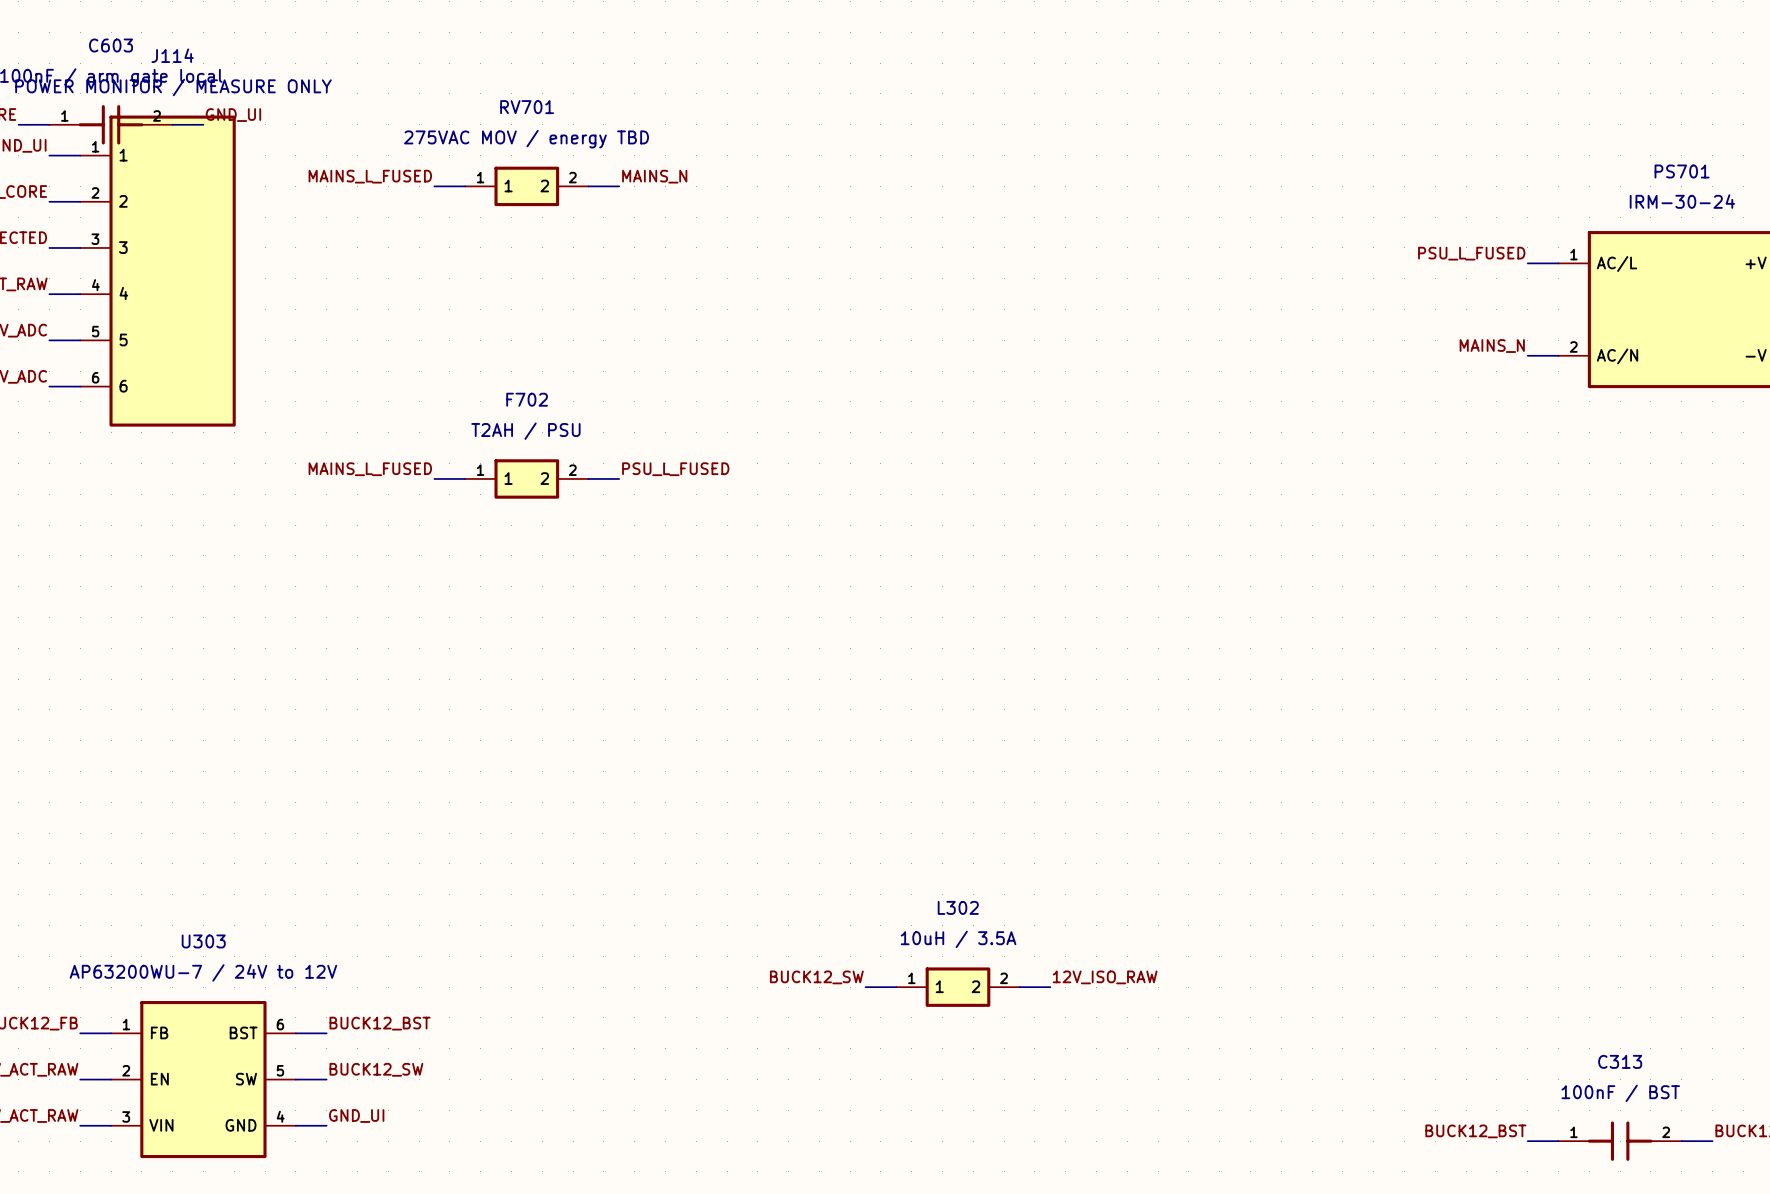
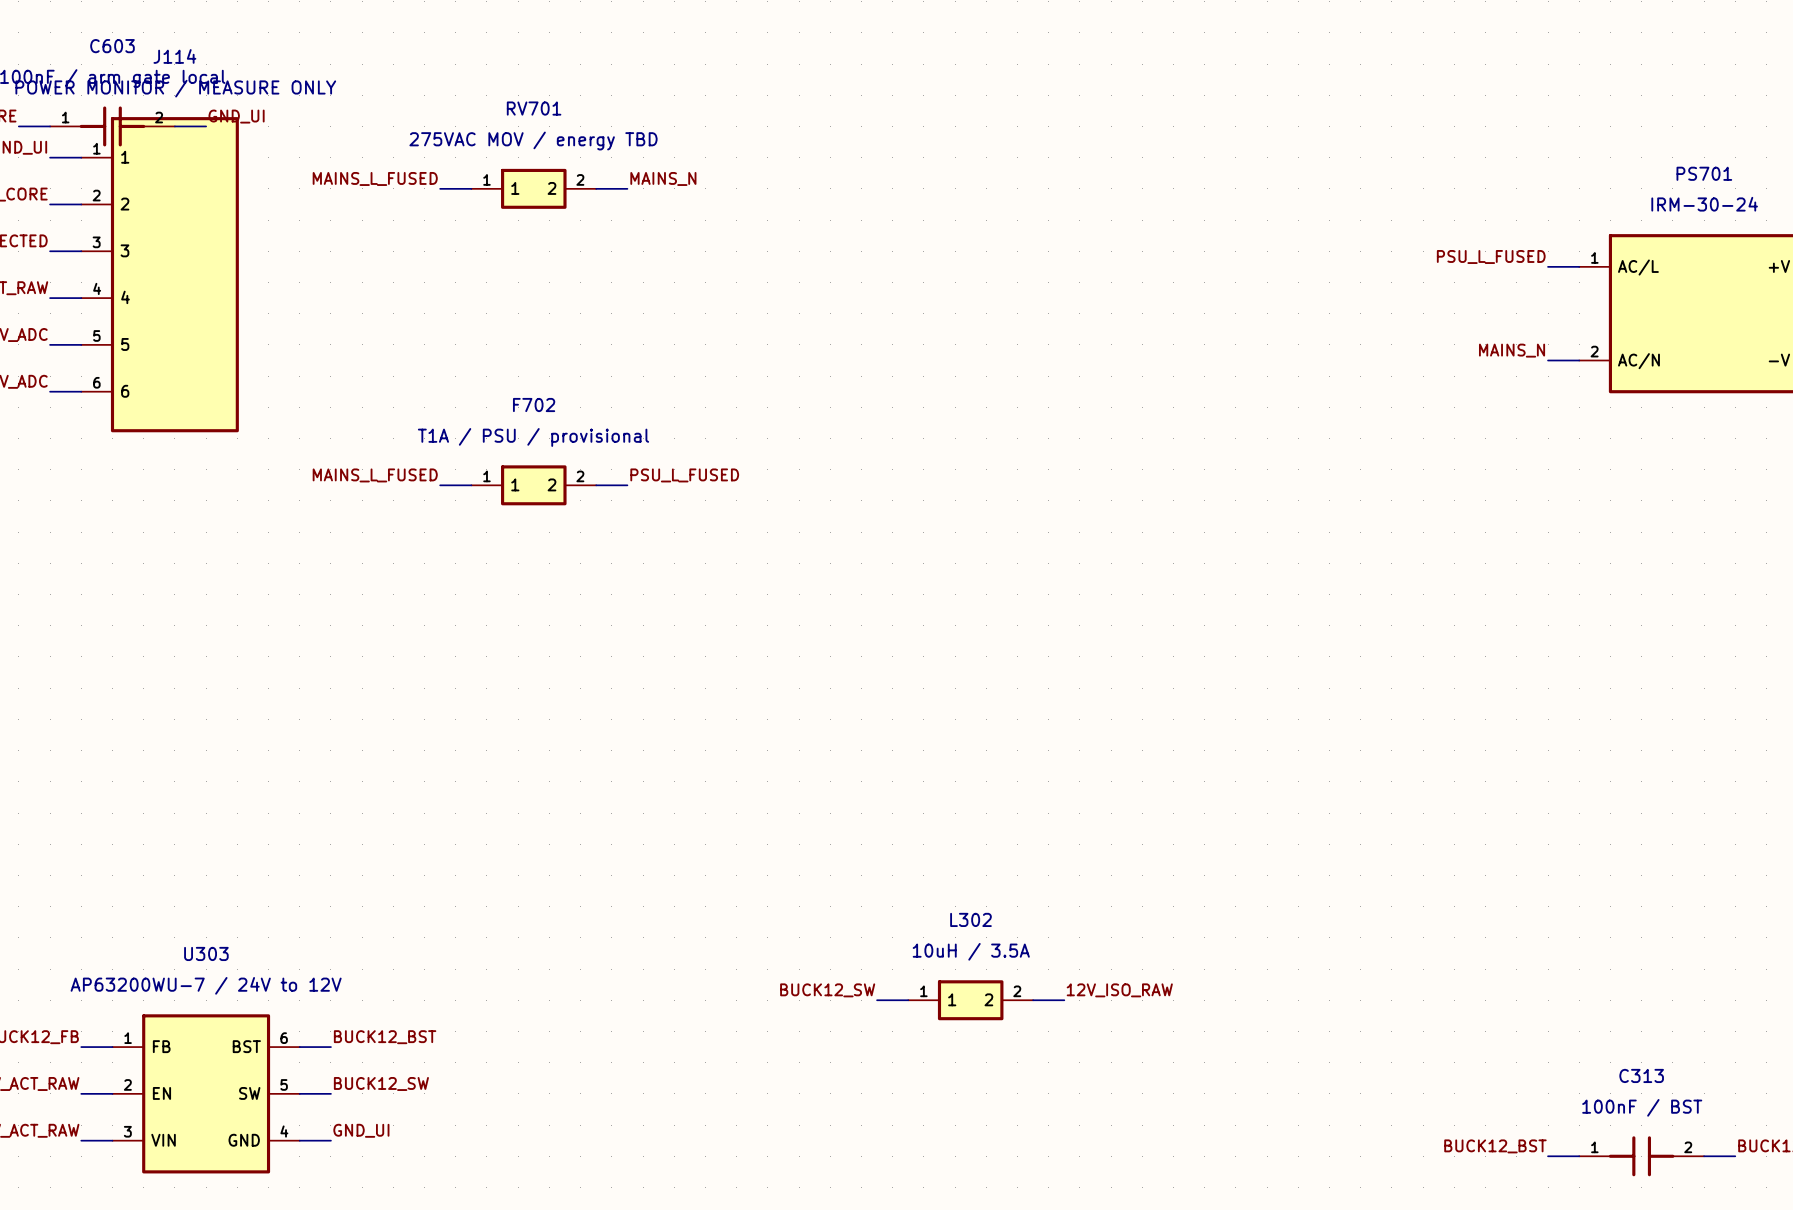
F702 value: T2AH / PSU (525, 431) -> T1A / PSU / provisional (533, 437)

